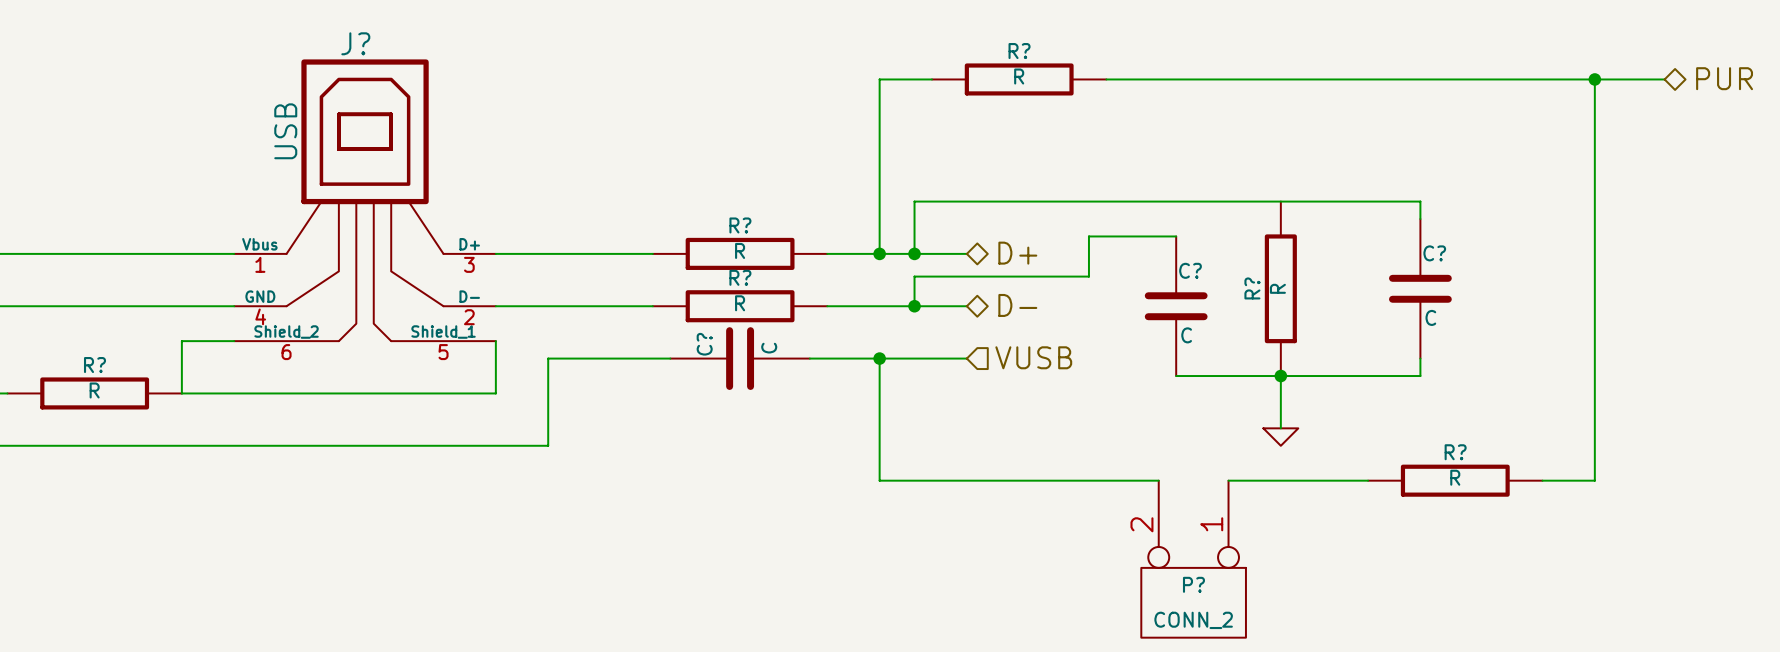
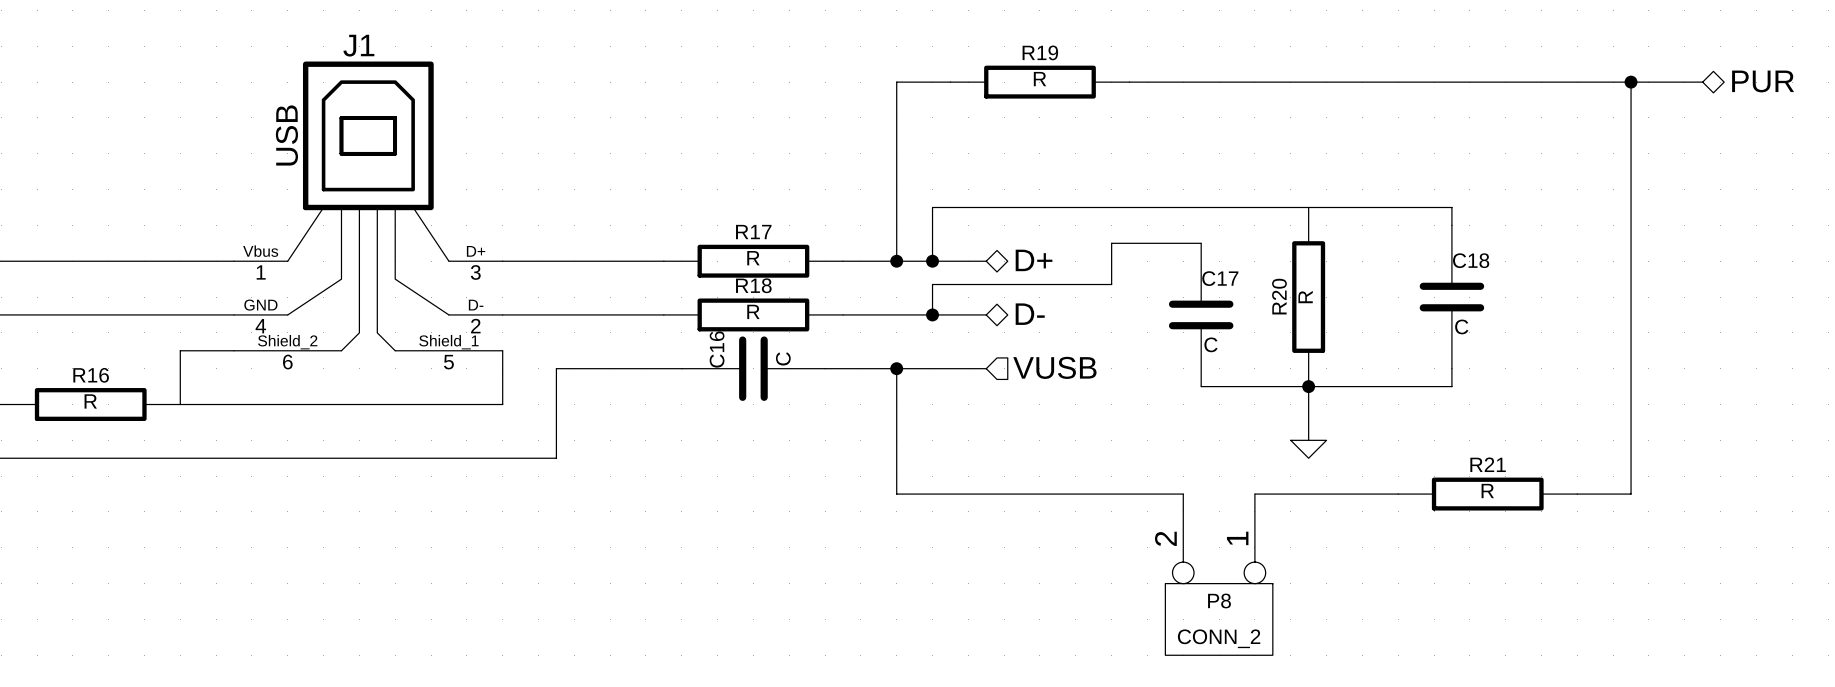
J? name: J? (355, 43) -> J1 (358, 45)
R? name: R? (1019, 51) -> R19 (1040, 52)
R? name: R? (740, 225) -> R17 (753, 232)
C? name: C? (1434, 253) -> C18 (1471, 260)
C? name: C? (1190, 270) -> C17 (1220, 278)
R? name: R? (740, 277) -> R18 (753, 285)
R? name: R? (1252, 288) -> R20 (1279, 296)
C? name: C? (704, 344) -> C16 (717, 349)
R? name: R? (94, 365) -> R16 (91, 375)
R? name: R? (1455, 452) -> R21 (1488, 464)
P? name: P? (1193, 584) -> P8 (1219, 600)

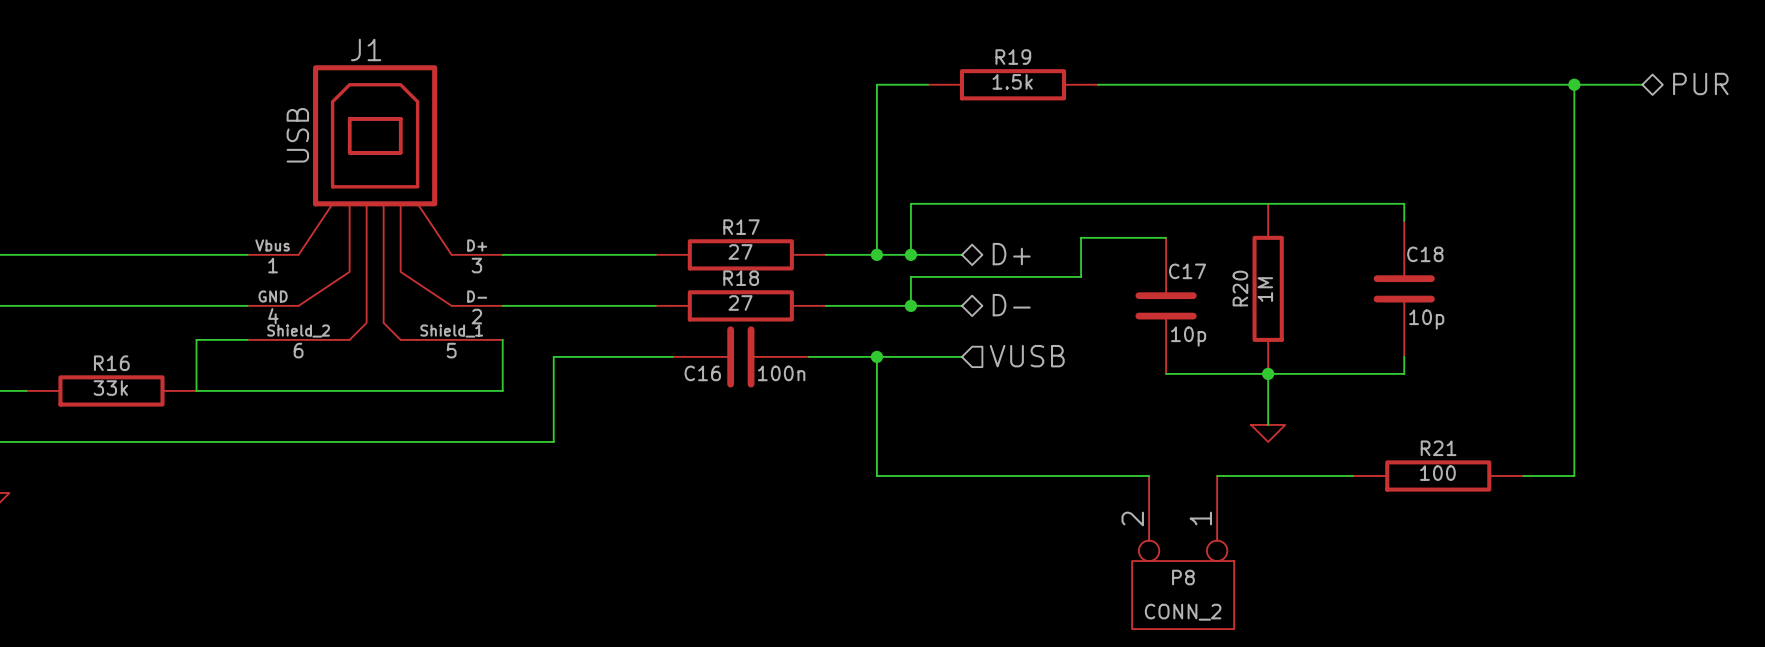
R19 value: R (1040, 79) -> 1.5k (1012, 81)
R17 value: R (753, 258) -> 27 (740, 251)
R20 value: R (1305, 297) -> 1M (1265, 289)
R18 value: R (753, 311) -> 27 (740, 302)
C18 value: C (1461, 326) -> 10p (1426, 319)
C17 value: C (1210, 344) -> 10p (1188, 336)
C16 name rotation: 0° (717, 349) -> 90° clockwise (702, 373)
C16 value: C (783, 358) -> 100n (781, 373)
R16 value: R (90, 401) -> 33k (110, 388)
R21 value: R (1487, 491) -> 100 (1437, 473)

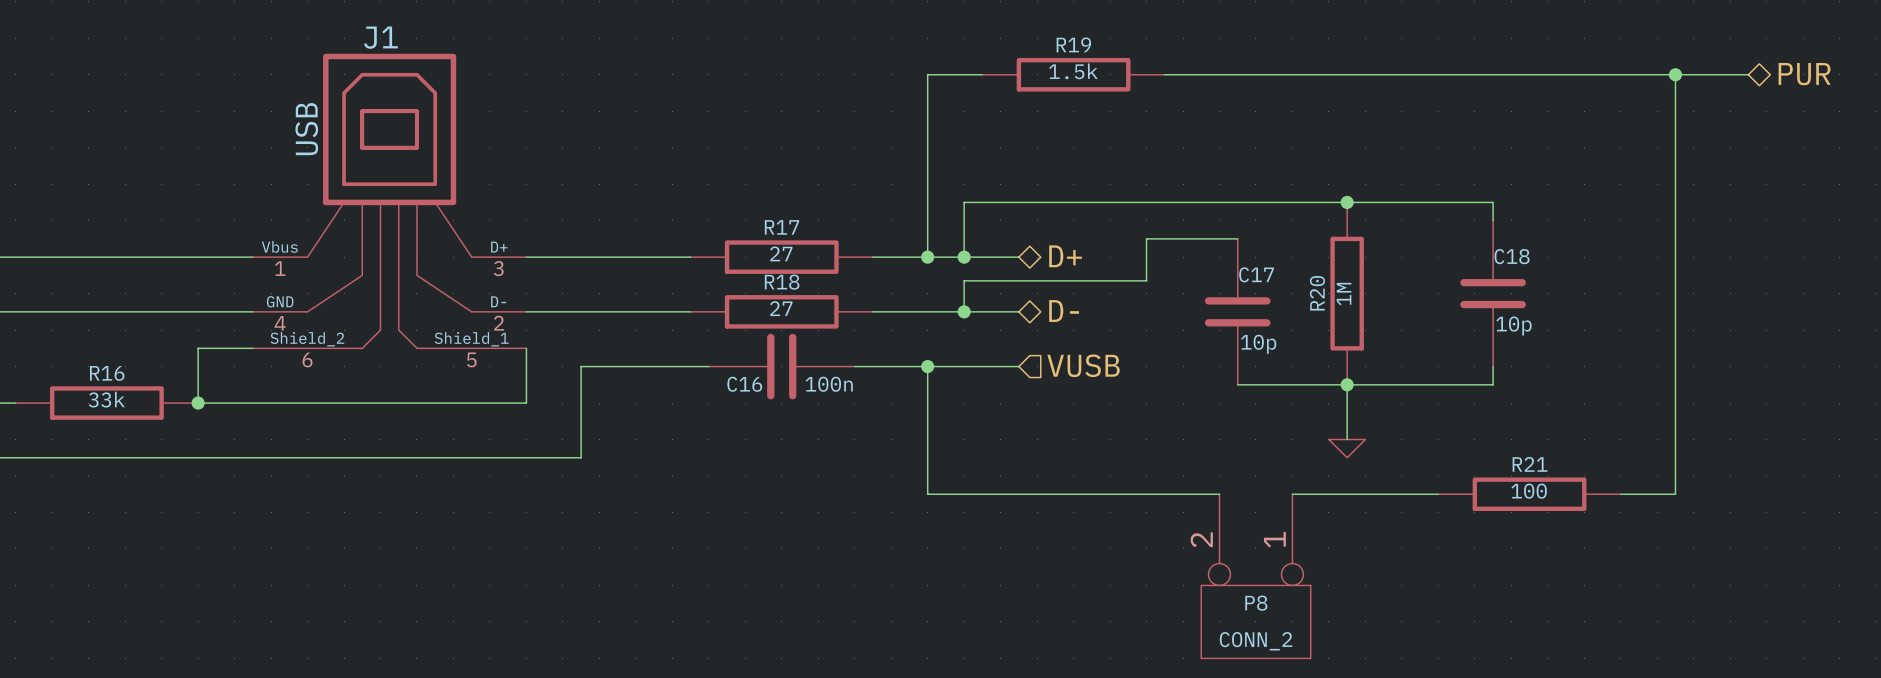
junction: none -> (1347, 202)
junction: none -> (198, 403)

